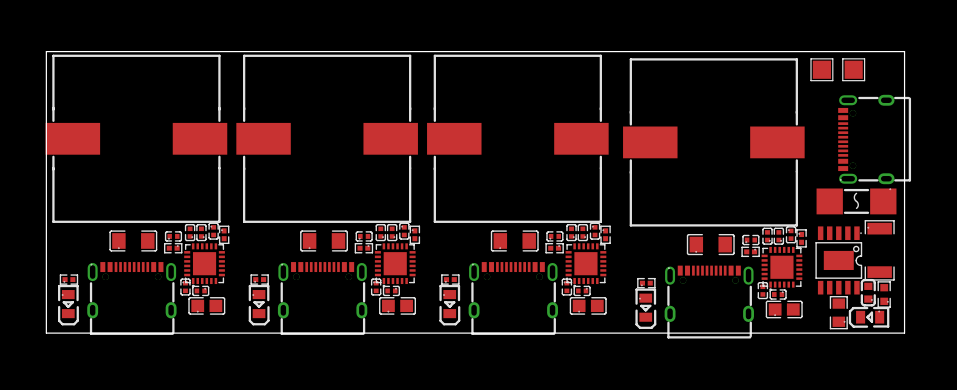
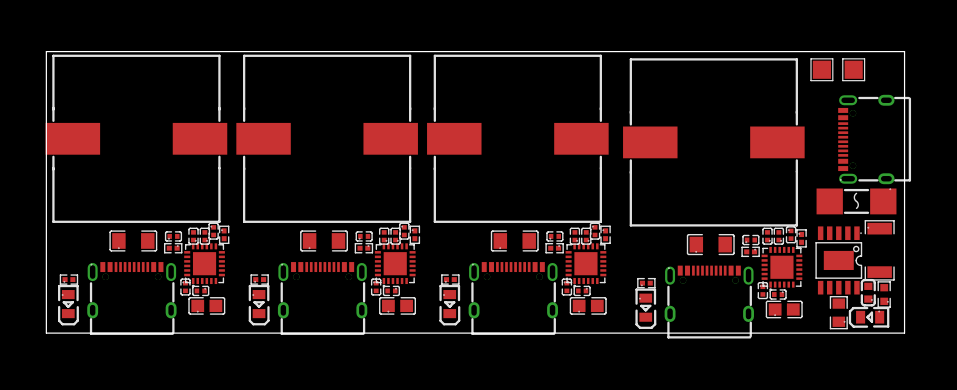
part: (190, 232) -> none
part: (201, 232) -> none
part: (380, 232) -> none
part: (392, 232) -> none
part: (571, 232) -> none
part: (582, 232) -> none
part: none -> (193, 236)
part: none -> (204, 236)
part: none -> (384, 236)
part: none -> (395, 236)
part: none -> (574, 236)
part: none -> (586, 236)

